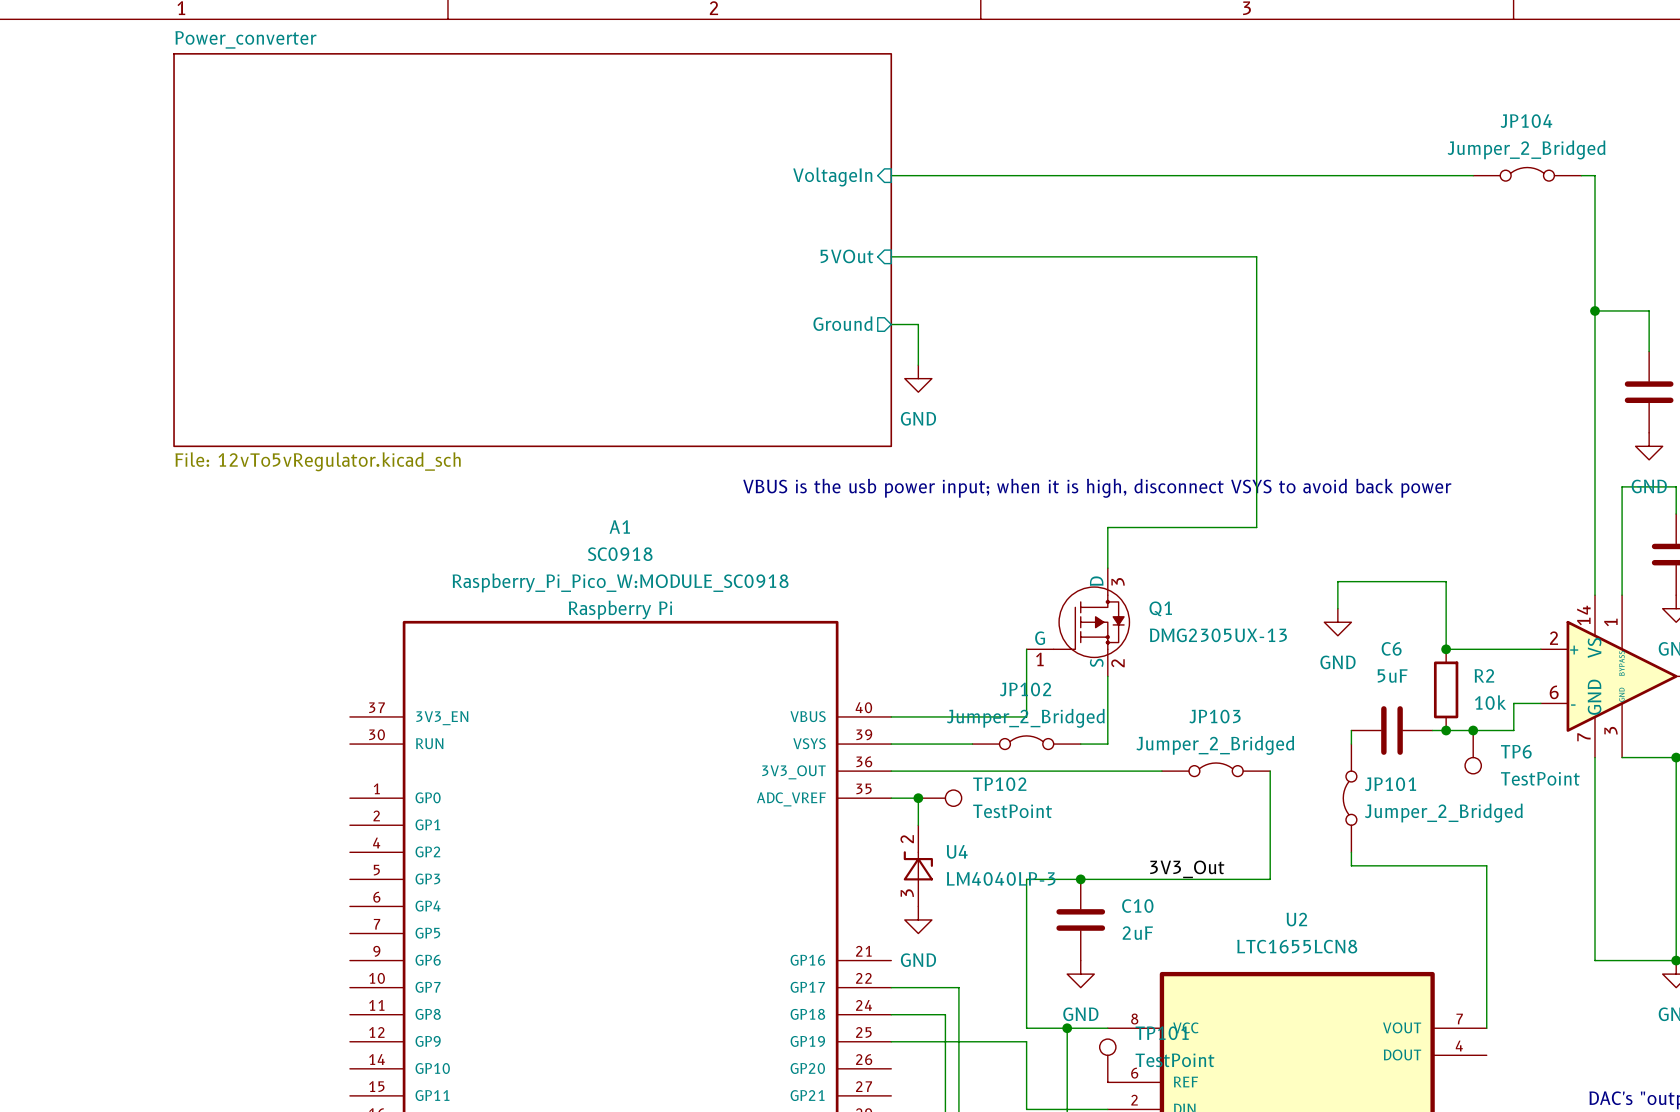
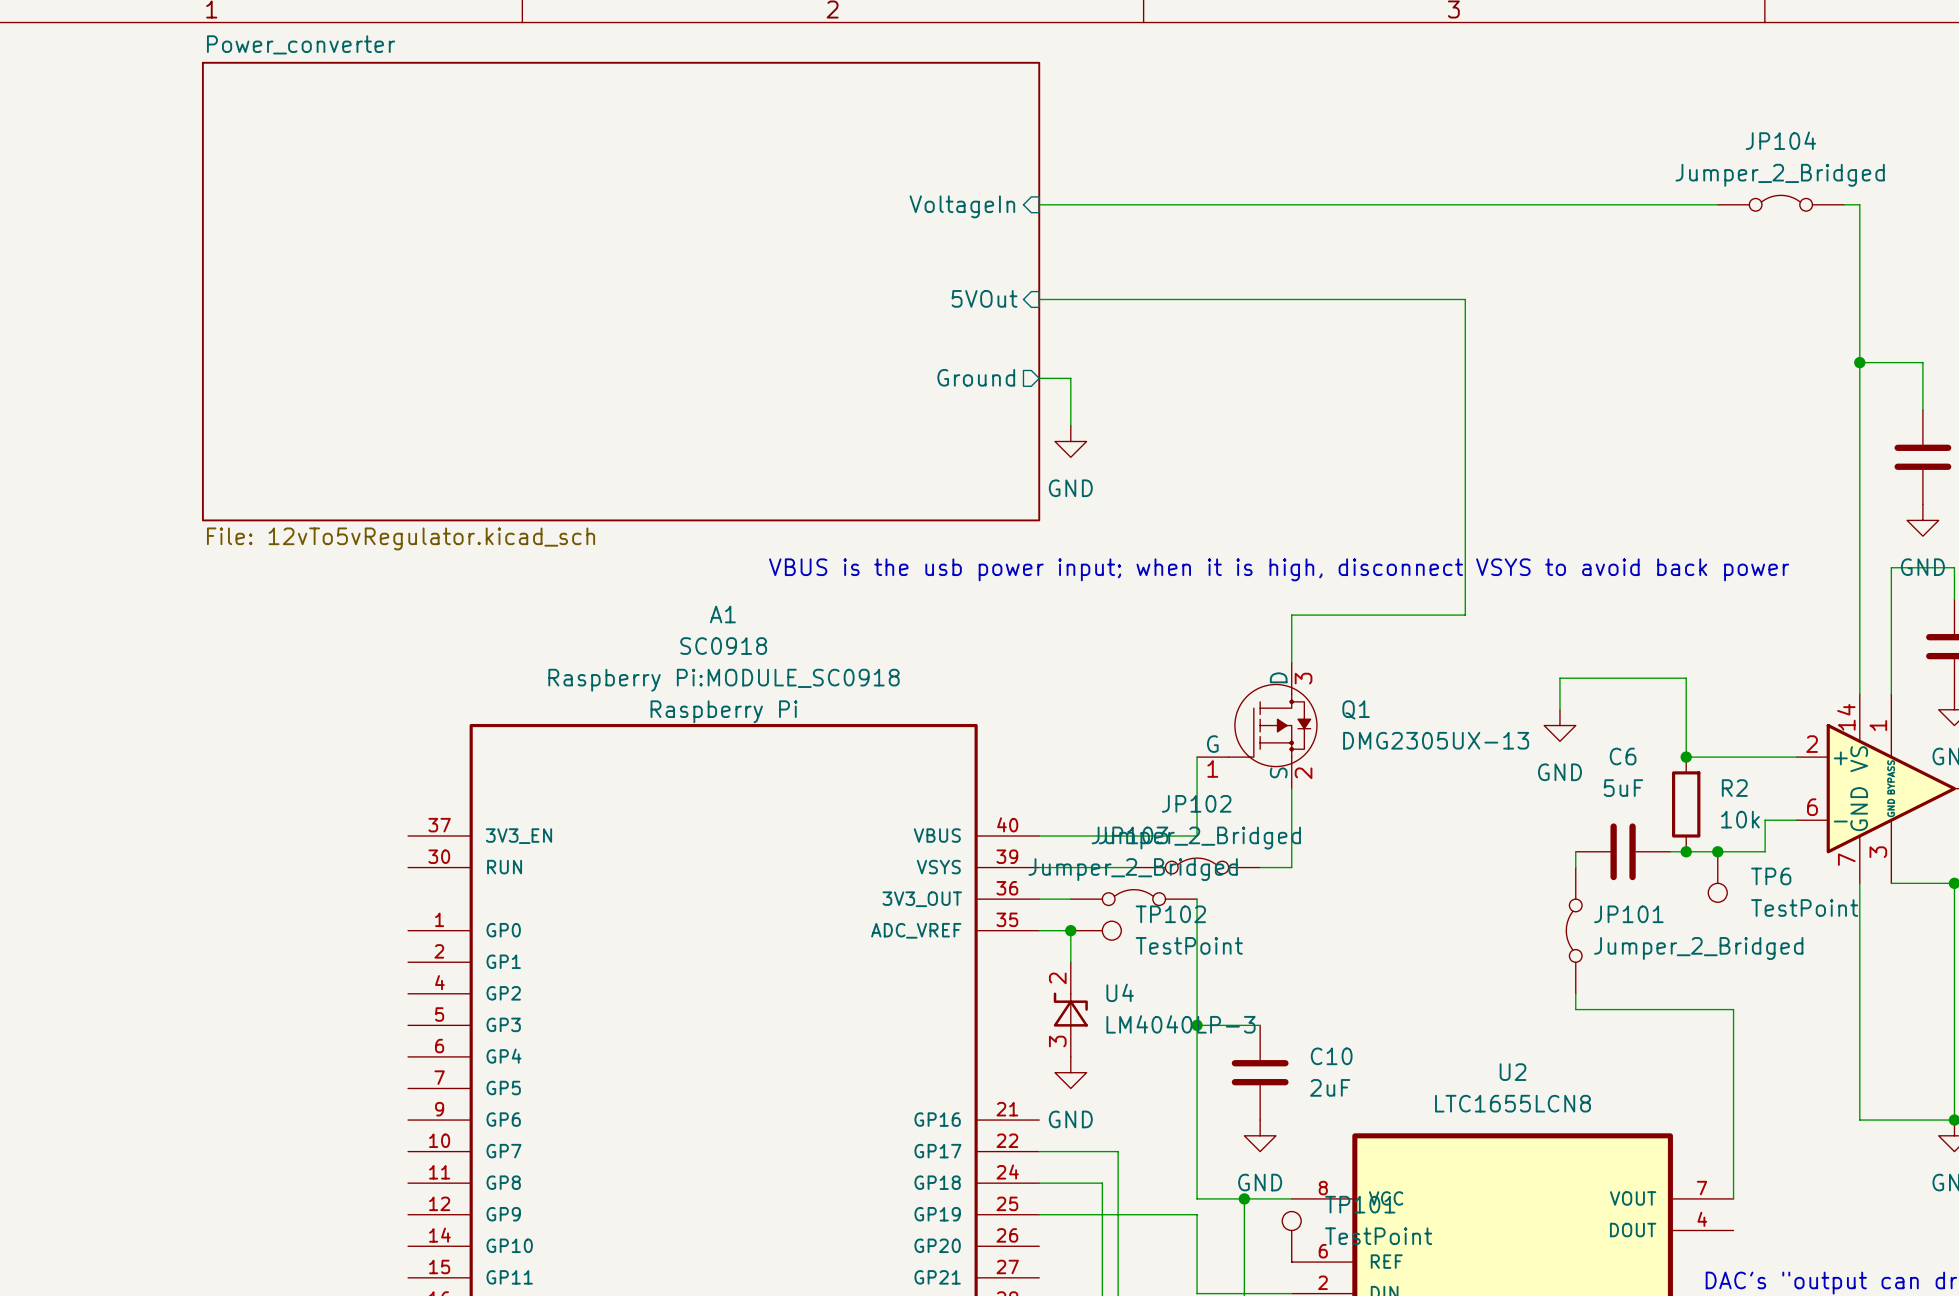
A1 text: Raspberry_Pi_Pico_W:MODULE_SC0918 (620, 582) -> Raspberry Pi:MODULE_SC0918 (724, 680)
JP103 position: (1216, 769) -> (1133, 897)
wire: (918, 771) (1161, 771) -> none
wire: none -> (1197, 899) (1197, 1025)
wire: (1270, 771) (1270, 879) (1080, 879) -> none
label: 3V3_Out (1187, 869) -> none
junction position: (1080, 879) -> (1197, 1025)

